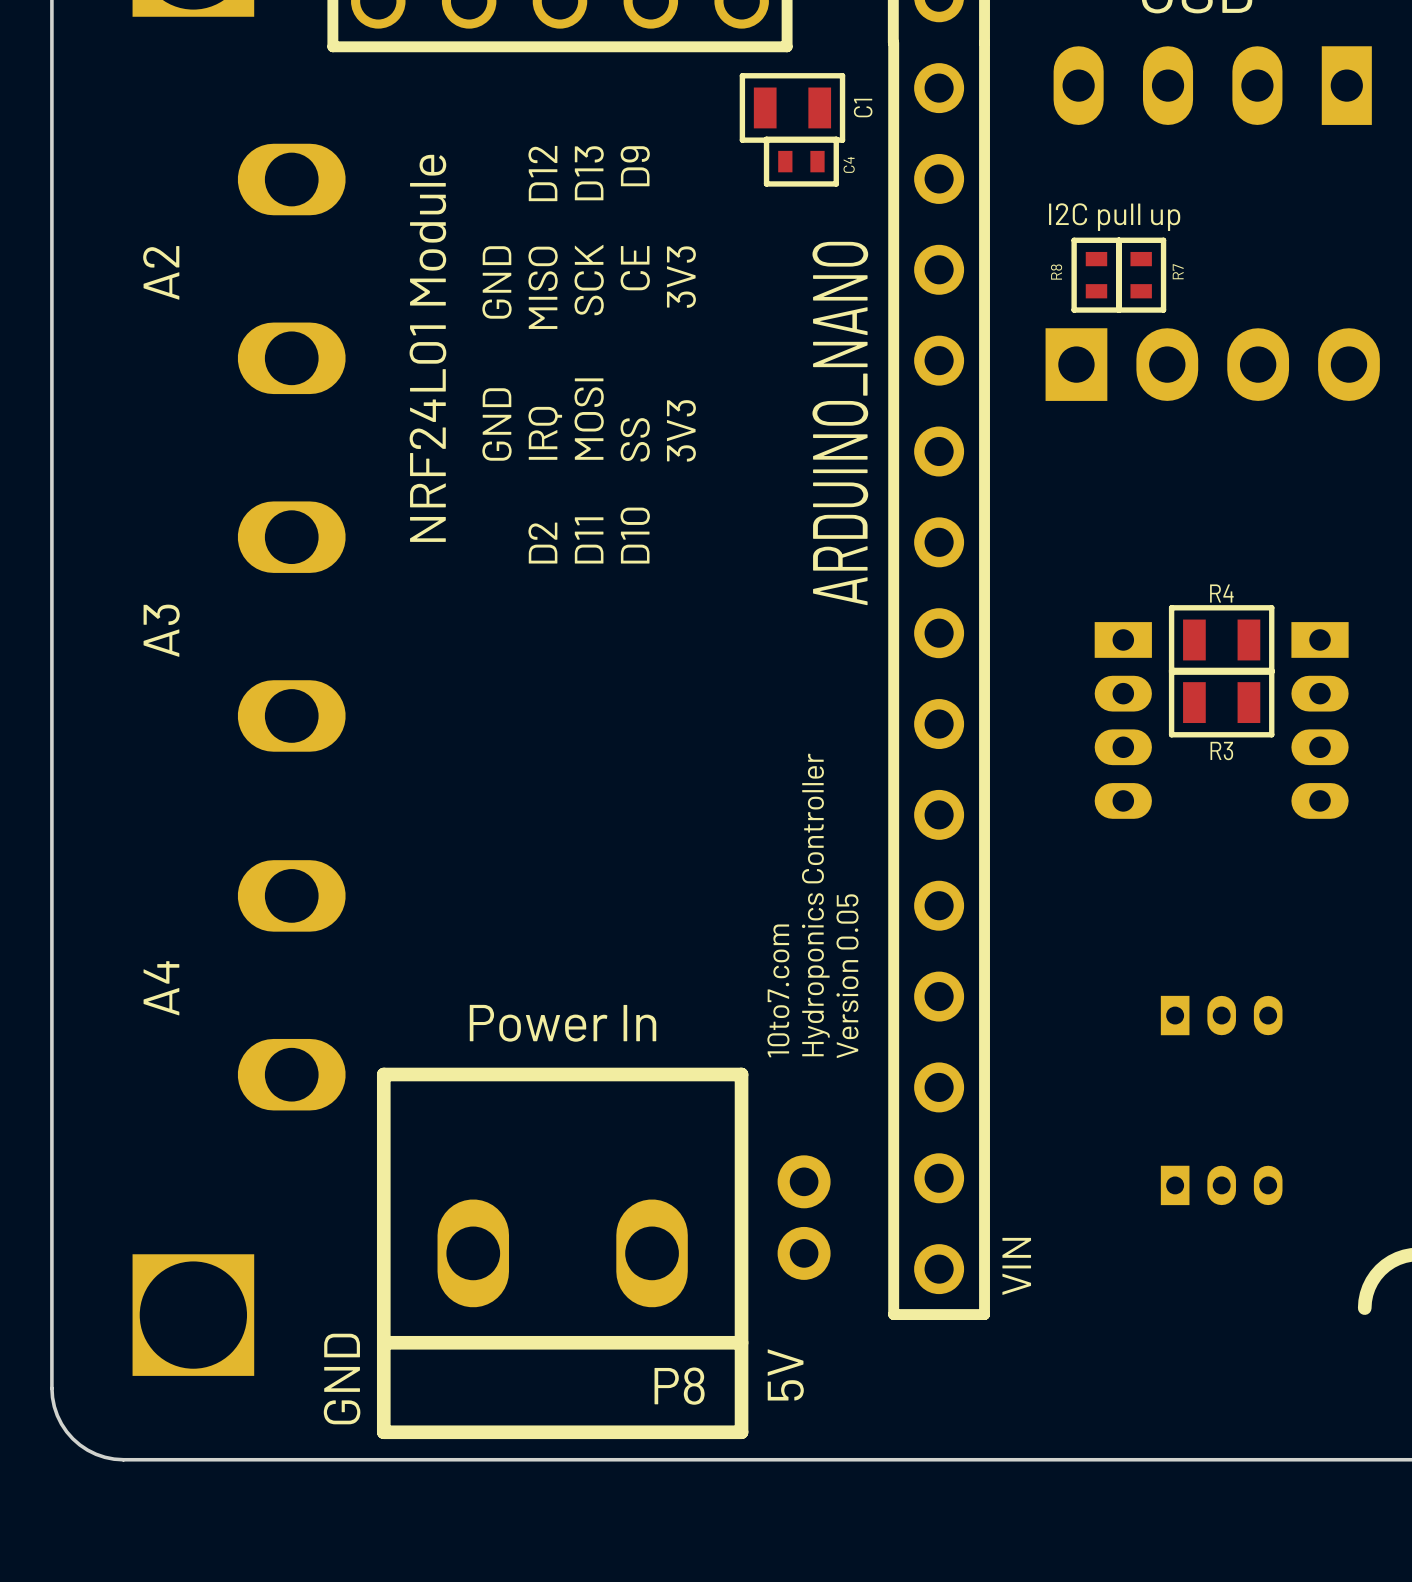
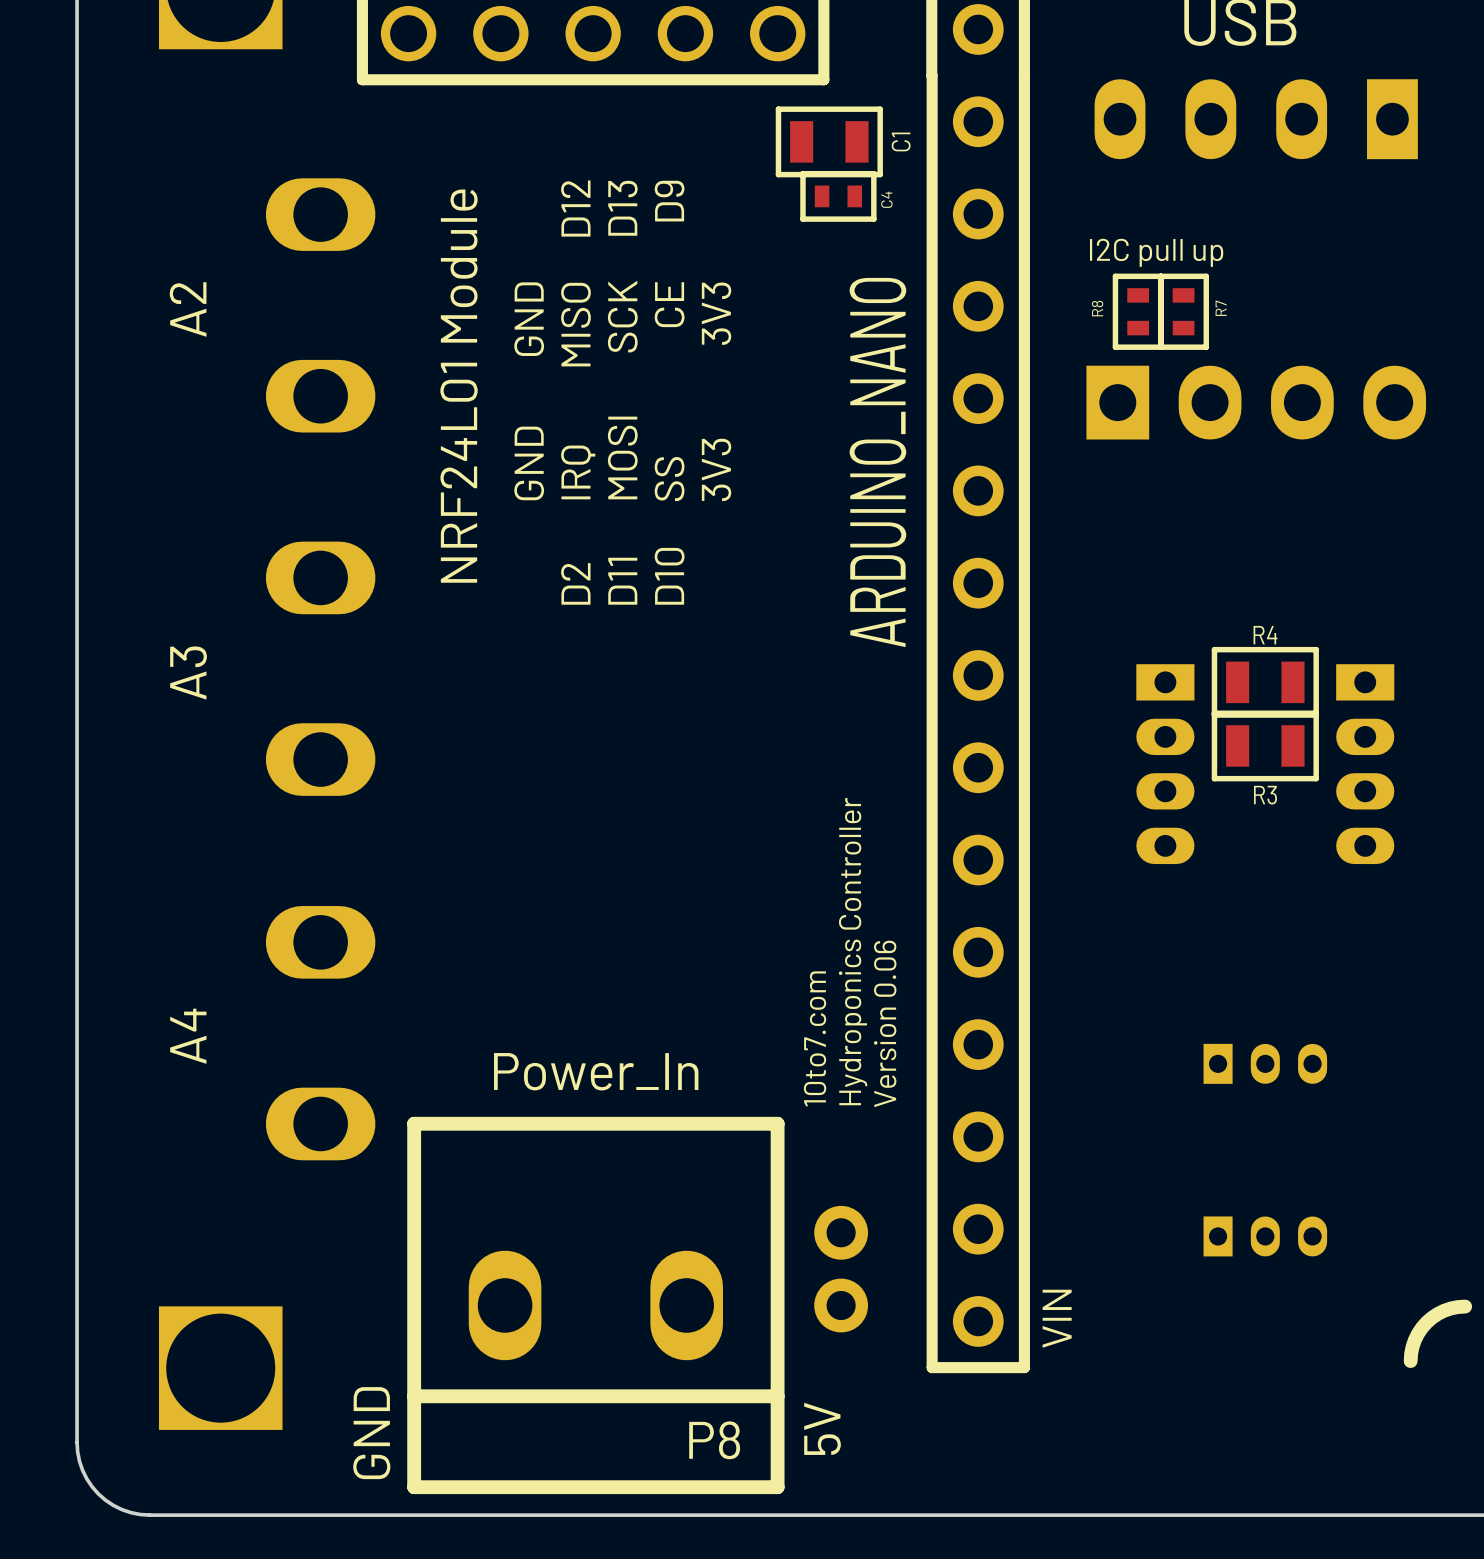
text: Version 0.05 (847, 976) -> Version 0.06 (885, 1023)
P8 value: Power In (563, 1023) -> Power_In (596, 1071)

